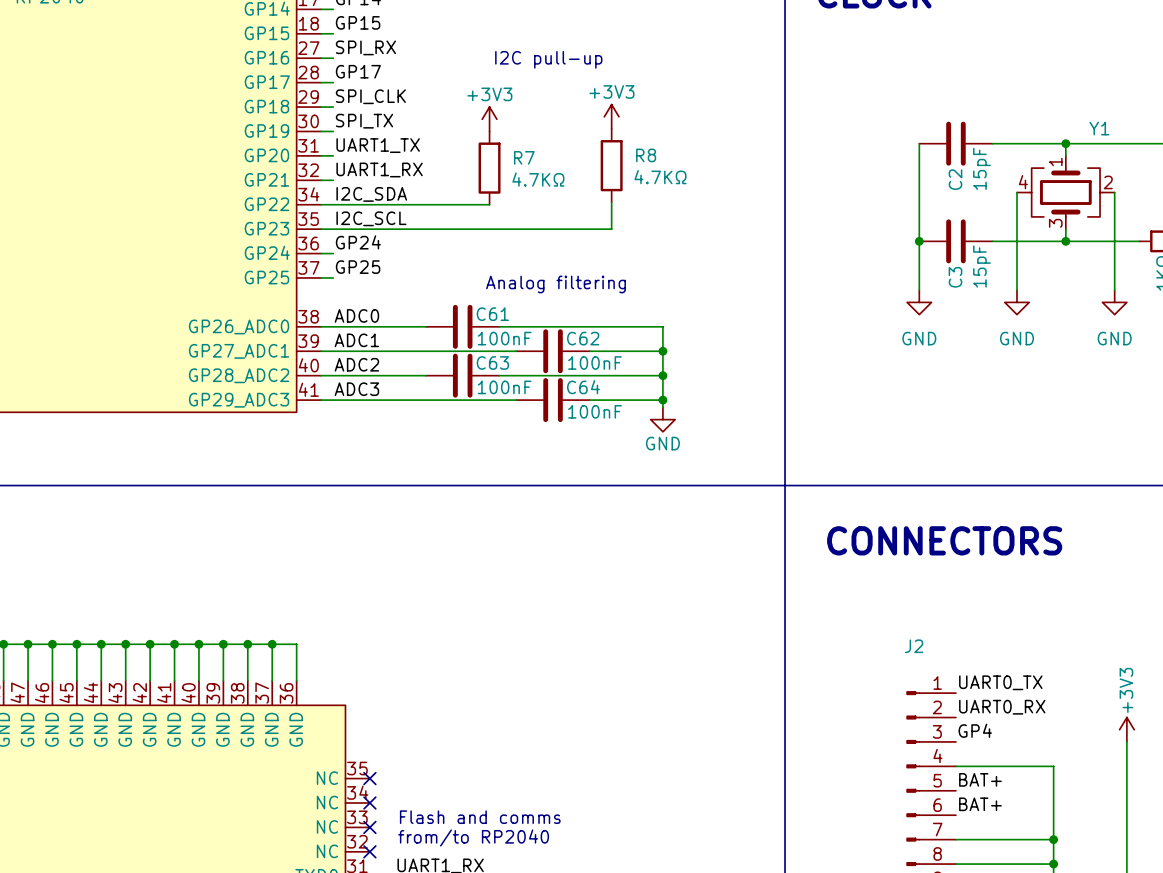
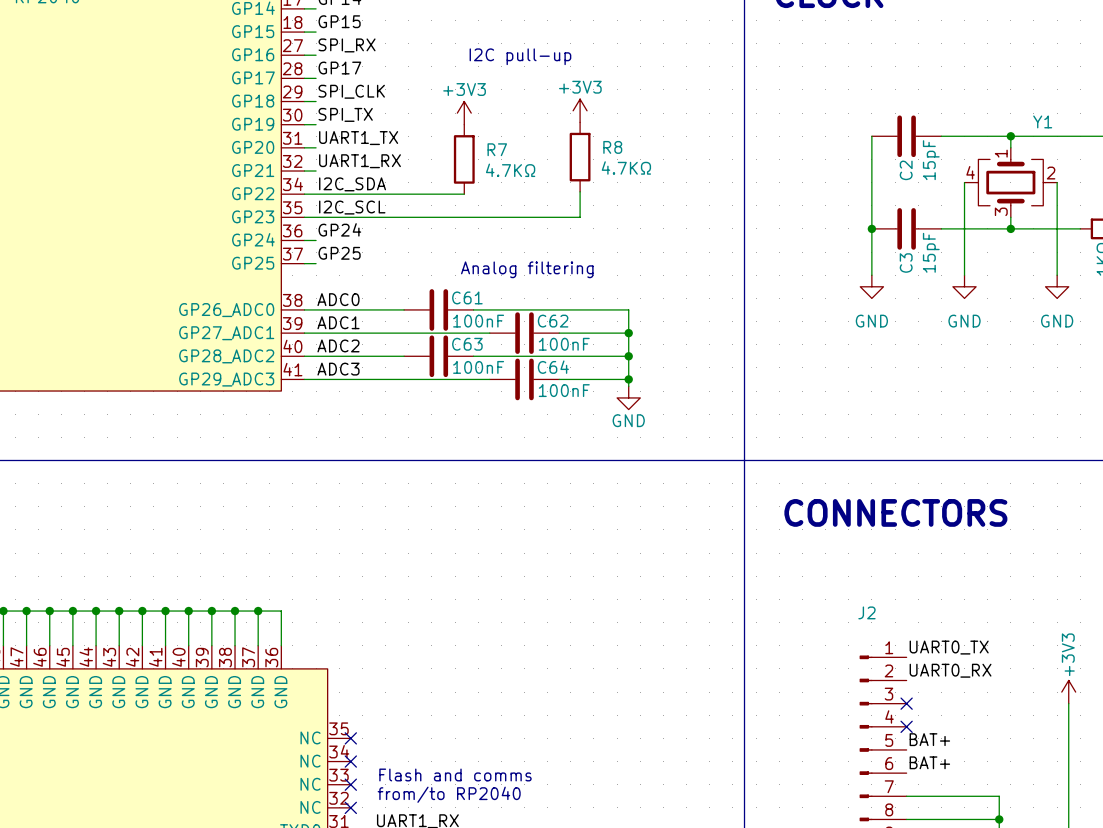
label: GP4 (975, 730) -> none
no-connect mark: none -> (906, 703)
wire: (955, 766) (1053, 766) (1053, 839) -> none
no-connect mark: none -> (906, 726)
junction: (1053, 839) -> none

